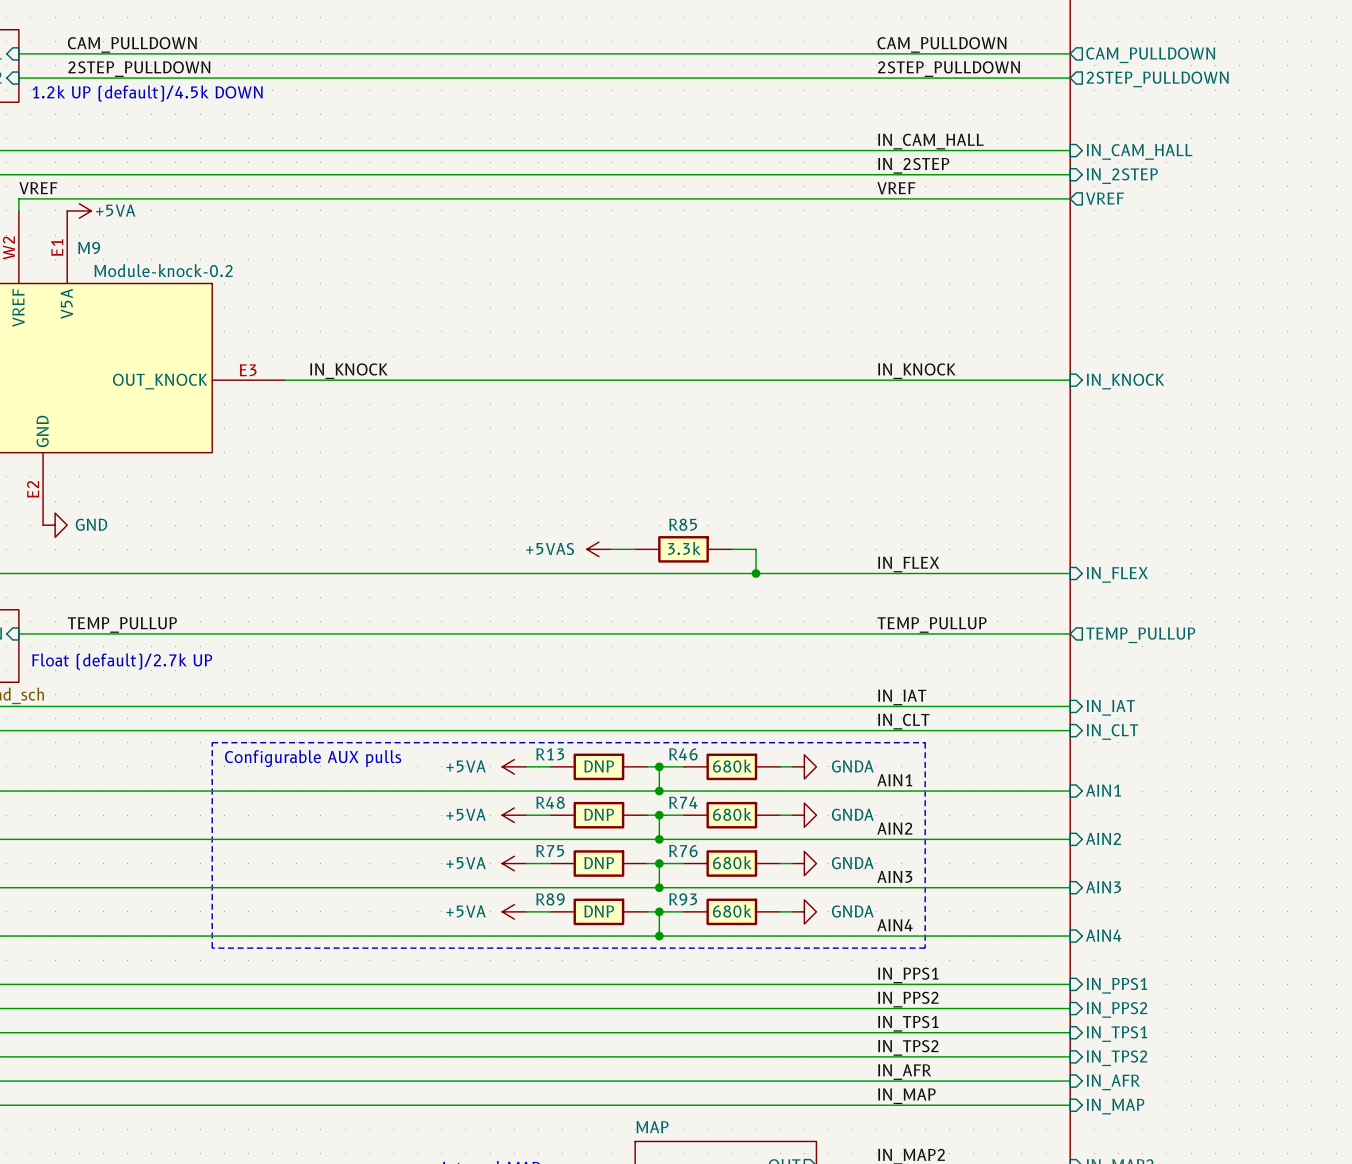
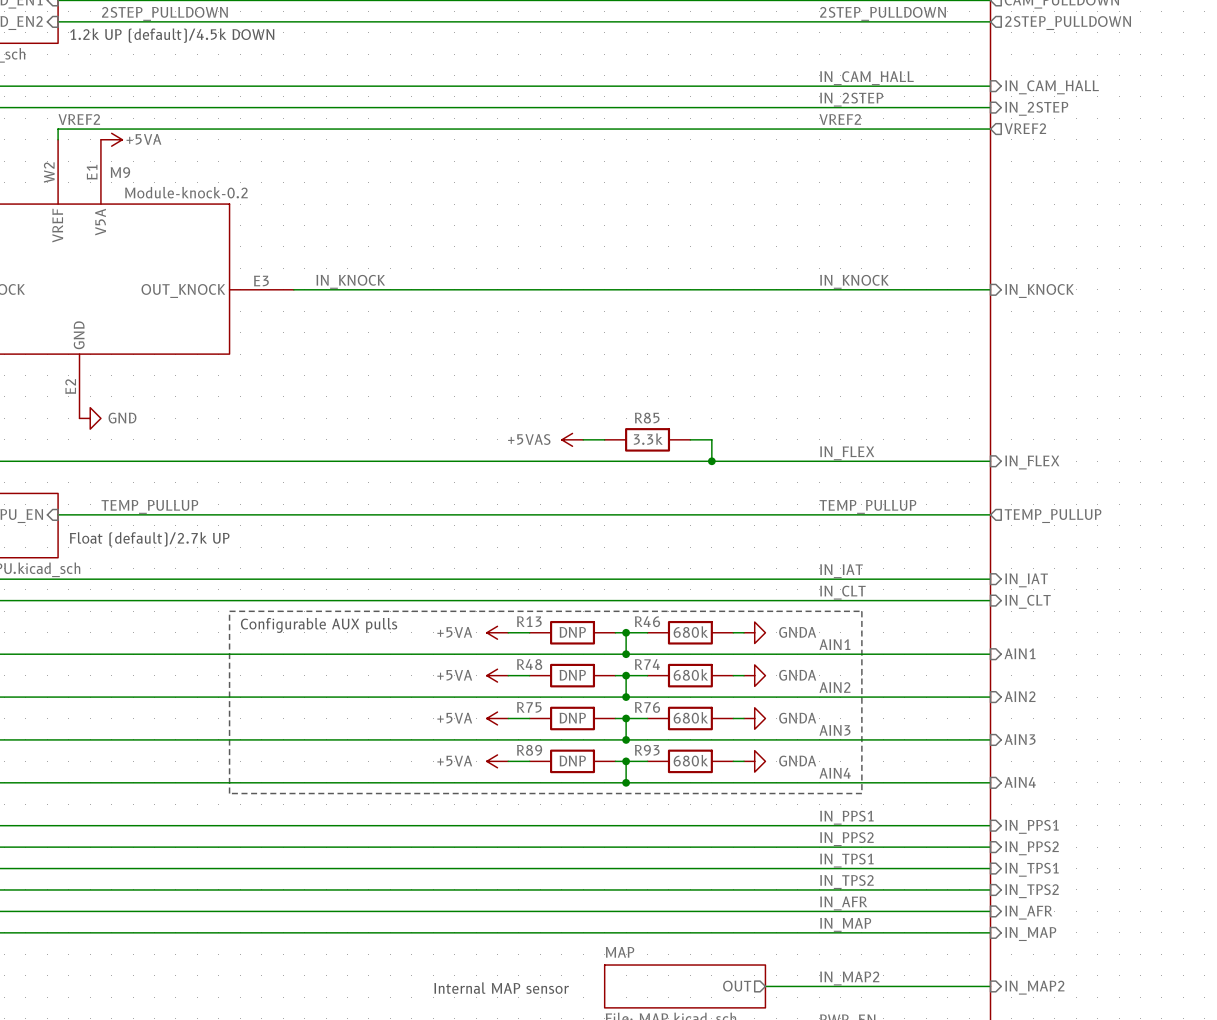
label: VREF (38, 188) -> VREF2 (79, 119)
label: VREF (896, 188) -> VREF2 (840, 119)
sheet pin: VREF (1105, 198) -> VREF2 (1025, 128)

